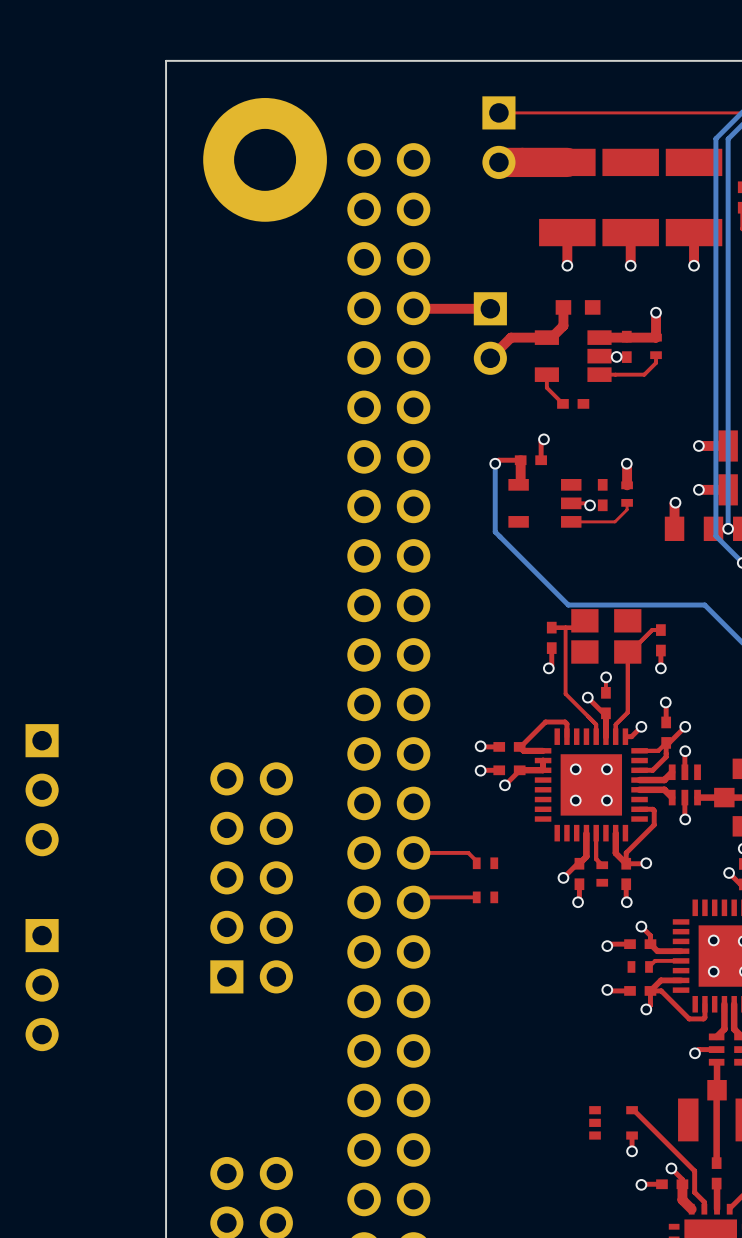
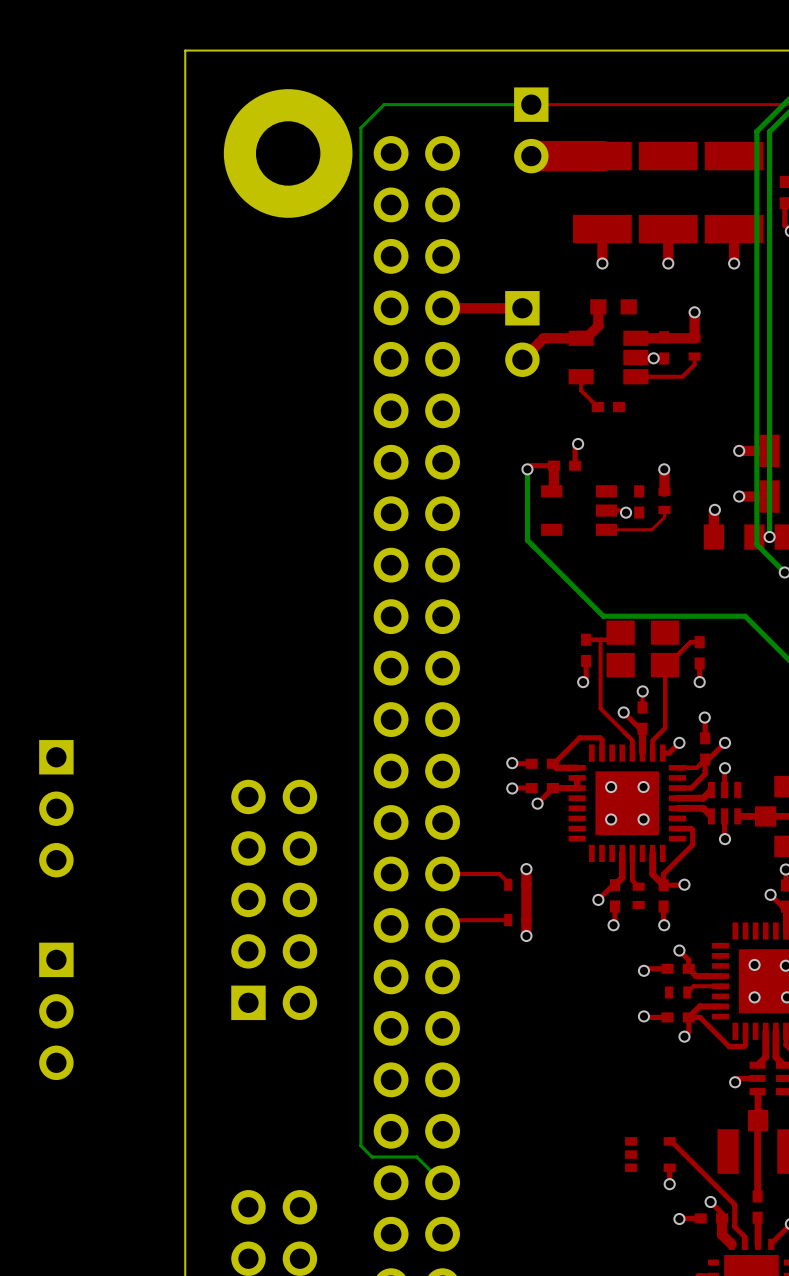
bottom track: none -> (531, 104) (384, 104) (360, 127) (360, 1145) (372, 1157) (416, 1157) (442, 1182)
top track: none -> (526, 869) (526, 935)
via: none -> (526, 869)
via: none -> (526, 935)

